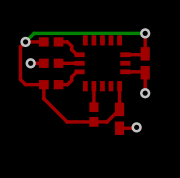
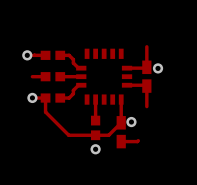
bottom track: (145, 33) (34, 33) (25, 41) -> none
via: (145, 33) -> none
top track: (31, 41) (25, 41) (20, 47) (20, 79) (25, 84) (30, 84) -> none
via: none -> (158, 68)
via position: (30, 63) -> (32, 97)
via: (145, 93) -> none
via: none -> (131, 122)
via: (136, 127) -> none
via: none -> (95, 149)

